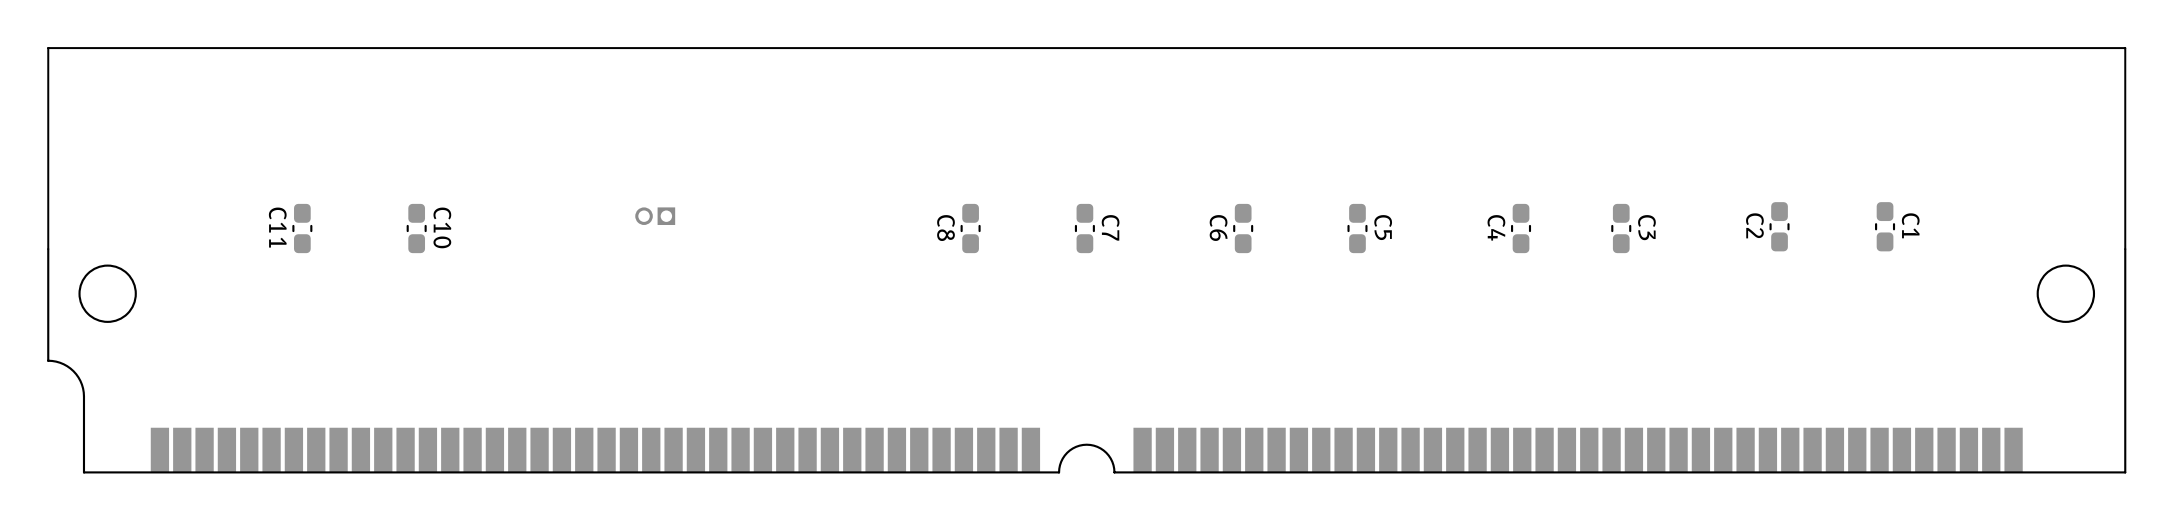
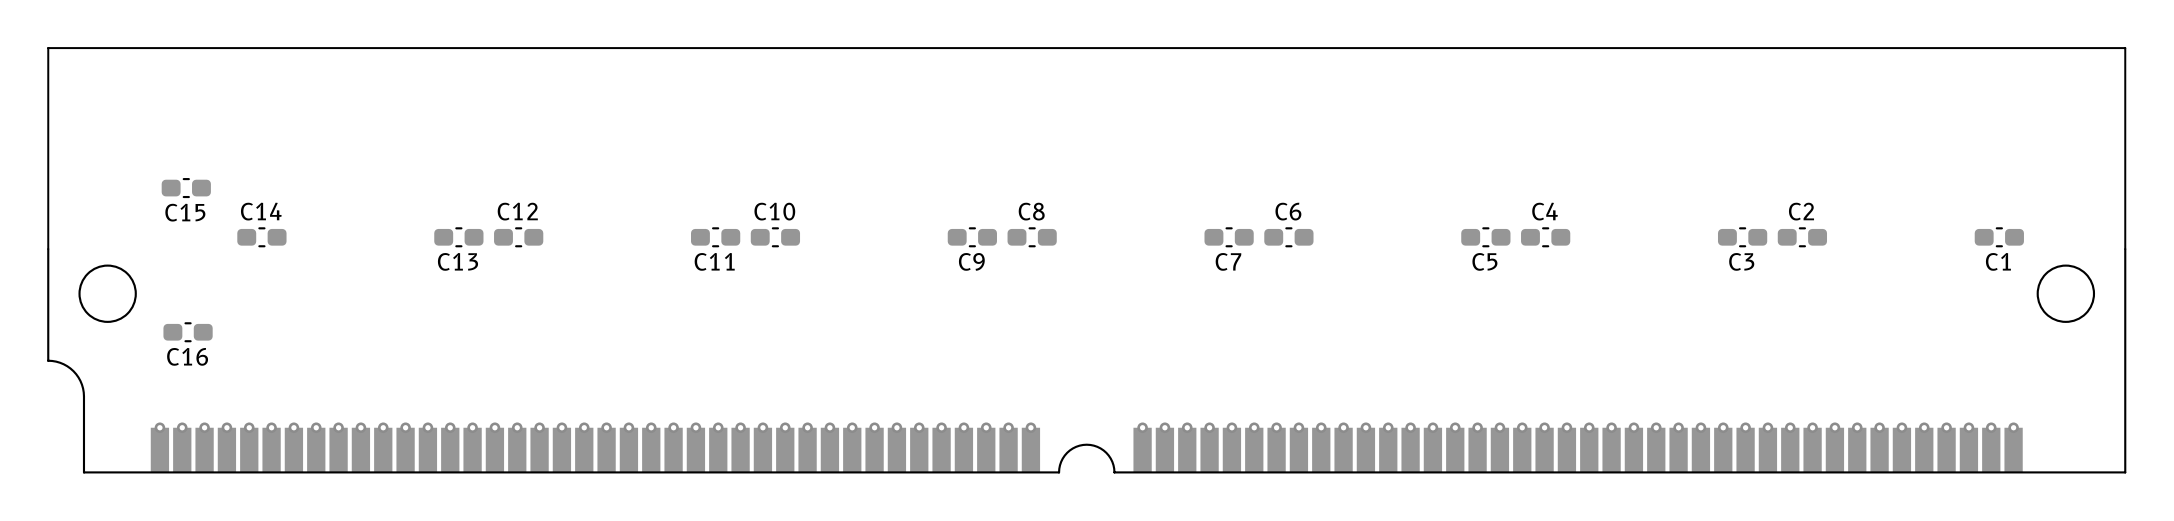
C15: none -> (186, 188)
part: (655, 216) -> none
C2 rotation: 0° (1779, 226) -> 90° clockwise (1802, 237)
C1 rotation: 0° (1885, 226) -> 90° clockwise (1999, 237)
C1 position: (1885, 226) -> (1999, 237)
C11 name position: C11 (277, 227) -> C11 (714, 261)
C10 name position: C10 (442, 227) -> C10 (774, 211)
C11 rotation: 0° (302, 228) -> 90° clockwise (715, 237)
C11 position: (302, 228) -> (715, 237)
C10 rotation: 0° (416, 228) -> 90° clockwise (775, 237)
C10 position: (416, 228) -> (775, 237)
C8 rotation: 0° (970, 228) -> 90° clockwise (1032, 237)
C8 position: (970, 228) -> (1032, 237)
C7 rotation: 0° (1084, 228) -> 90° clockwise (1229, 237)
C7 position: (1084, 228) -> (1229, 237)
C6 rotation: 0° (1243, 228) -> 90° clockwise (1288, 237)
C6 position: (1243, 228) -> (1288, 237)
C5 rotation: 0° (1357, 228) -> 90° clockwise (1485, 237)
C5 position: (1357, 228) -> (1485, 237)
C4 rotation: 0° (1521, 228) -> 90° clockwise (1545, 237)
C3 rotation: 0° (1621, 228) -> 90° clockwise (1742, 237)
C3 position: (1621, 228) -> (1742, 237)
C14: none -> (261, 237)
C13: none -> (458, 237)
C12: none -> (518, 237)
C9: none -> (972, 237)
part footprint: [47, 248, 2127, 474] -> [47, 248, 2127, 474]
C16: none -> (188, 332)

